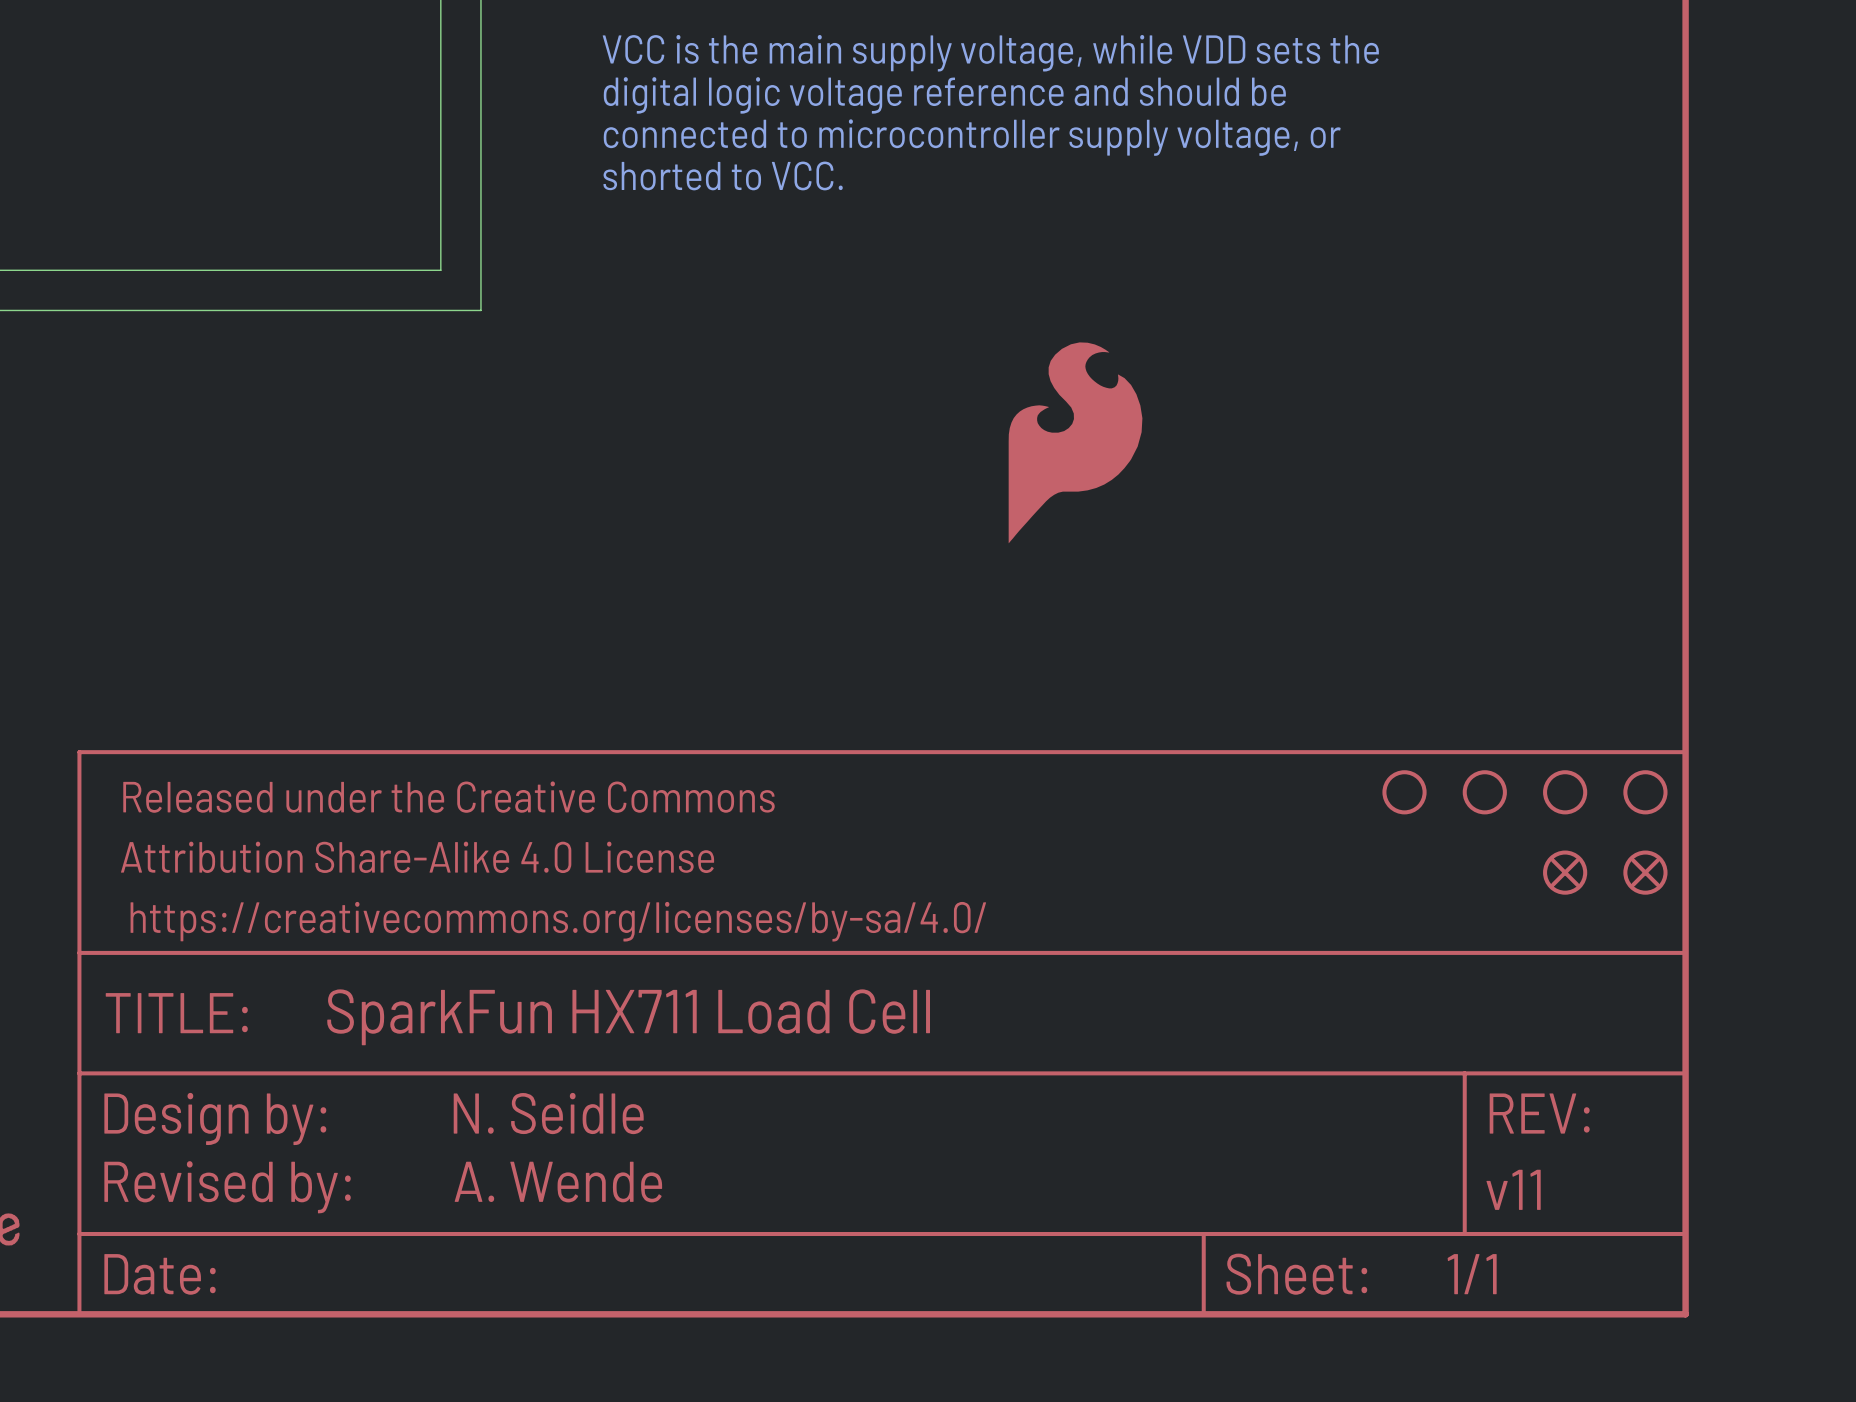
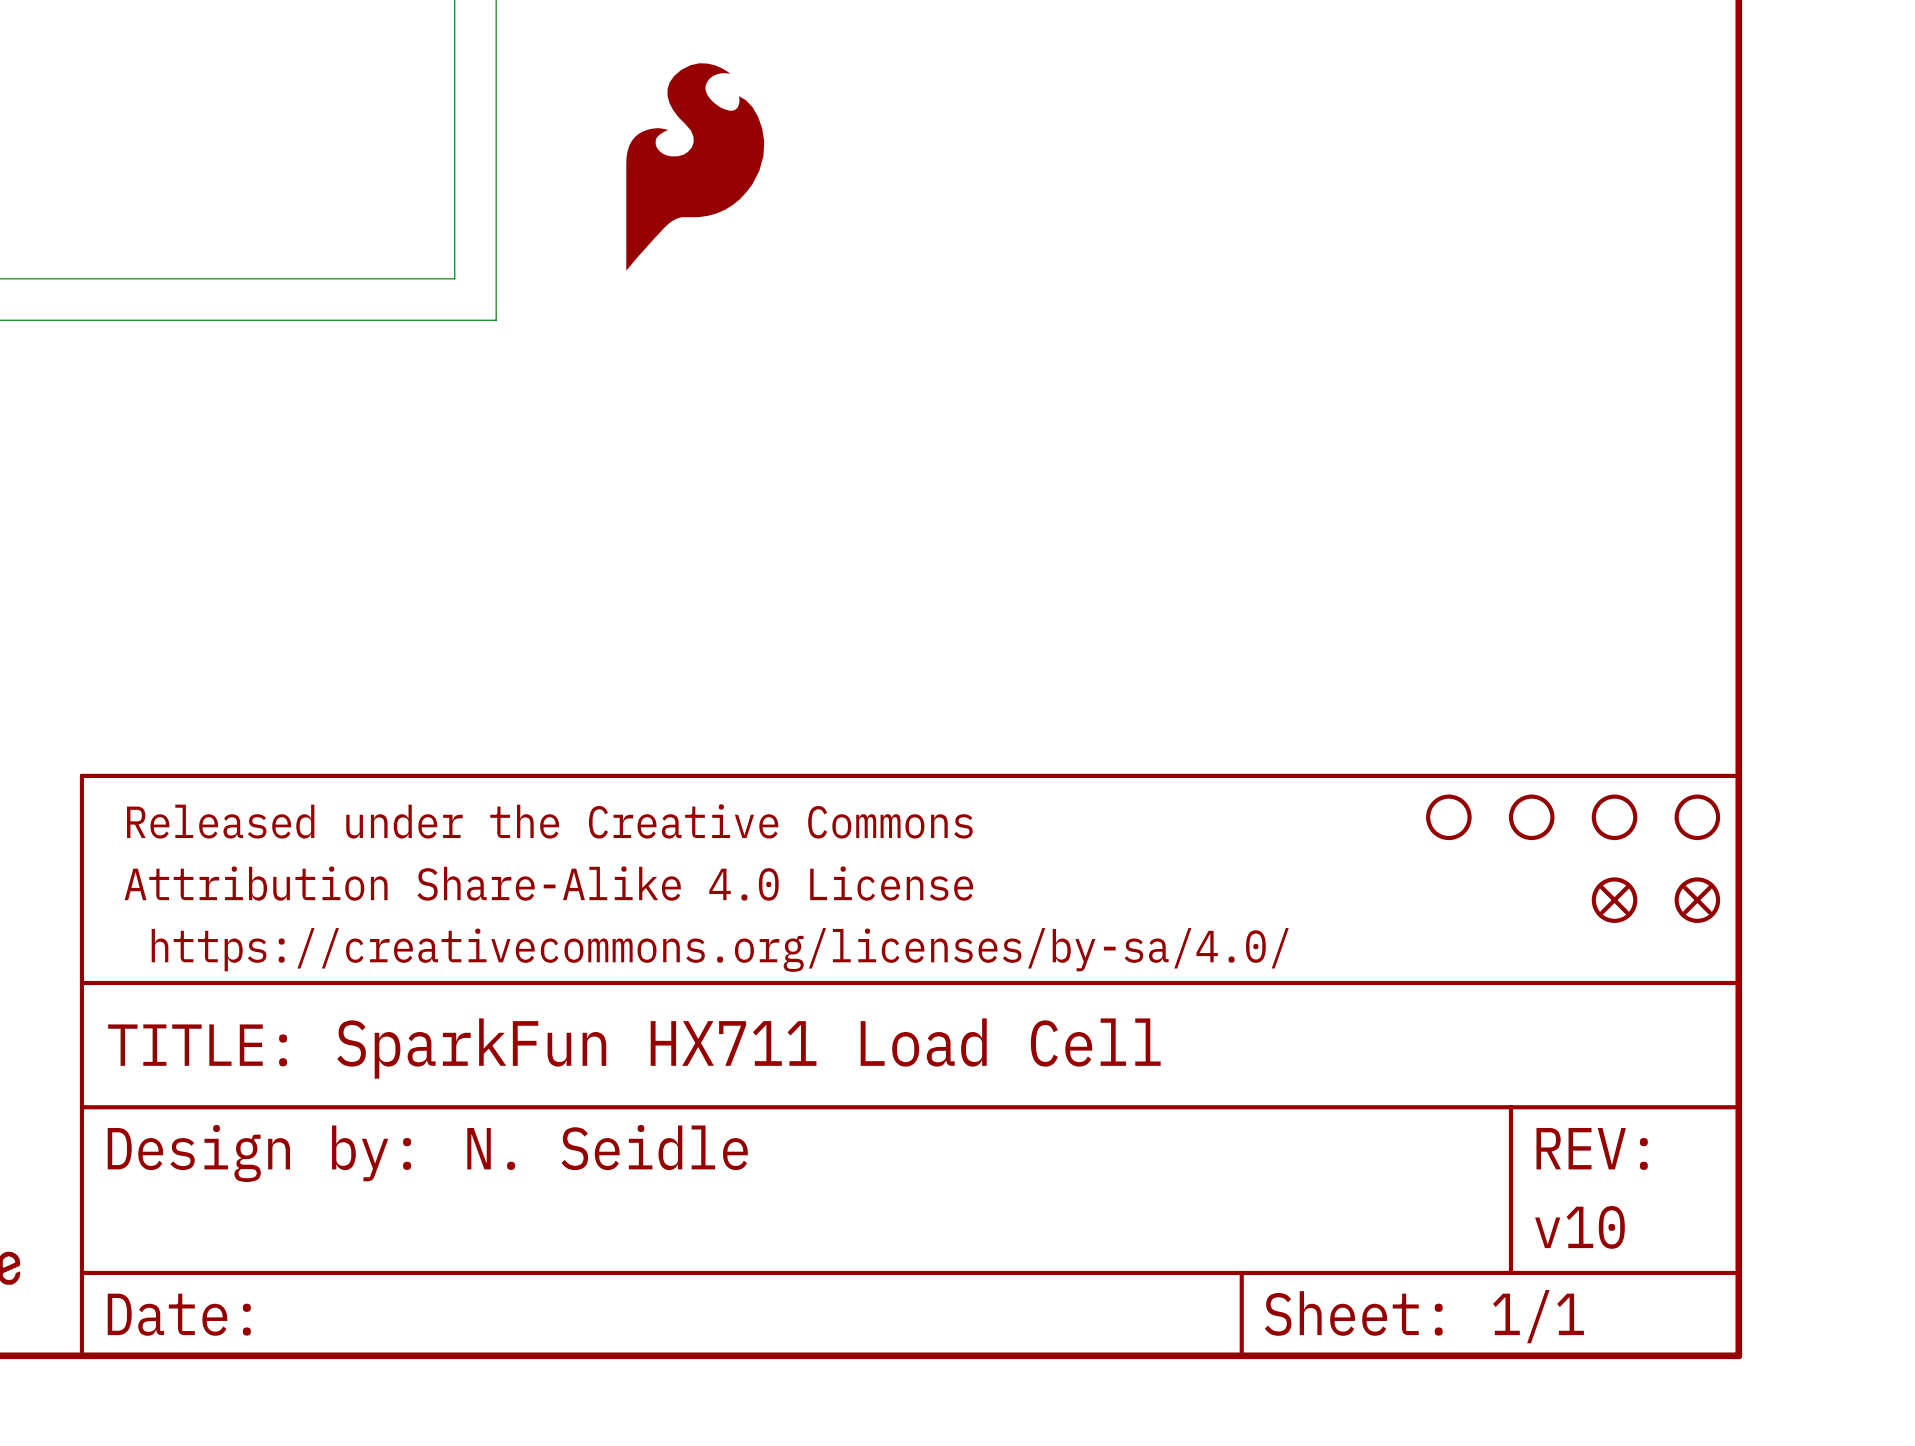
text: VCC is the main supply voltage, while VDD sets the (990, 53) -> none
text: digital logic voltage reference and should be (944, 95) -> none
text: connected to microcontroller supply voltage, or (972, 137) -> none
part: none -> (695, 166)
text: shorted to VCC. (723, 175) -> none
part: (1075, 442) -> none
text: A. Wende (558, 1182) -> none
text: Revised by: (227, 1187) -> none
part text: v11 (1513, 1189) -> v10 (1579, 1227)

